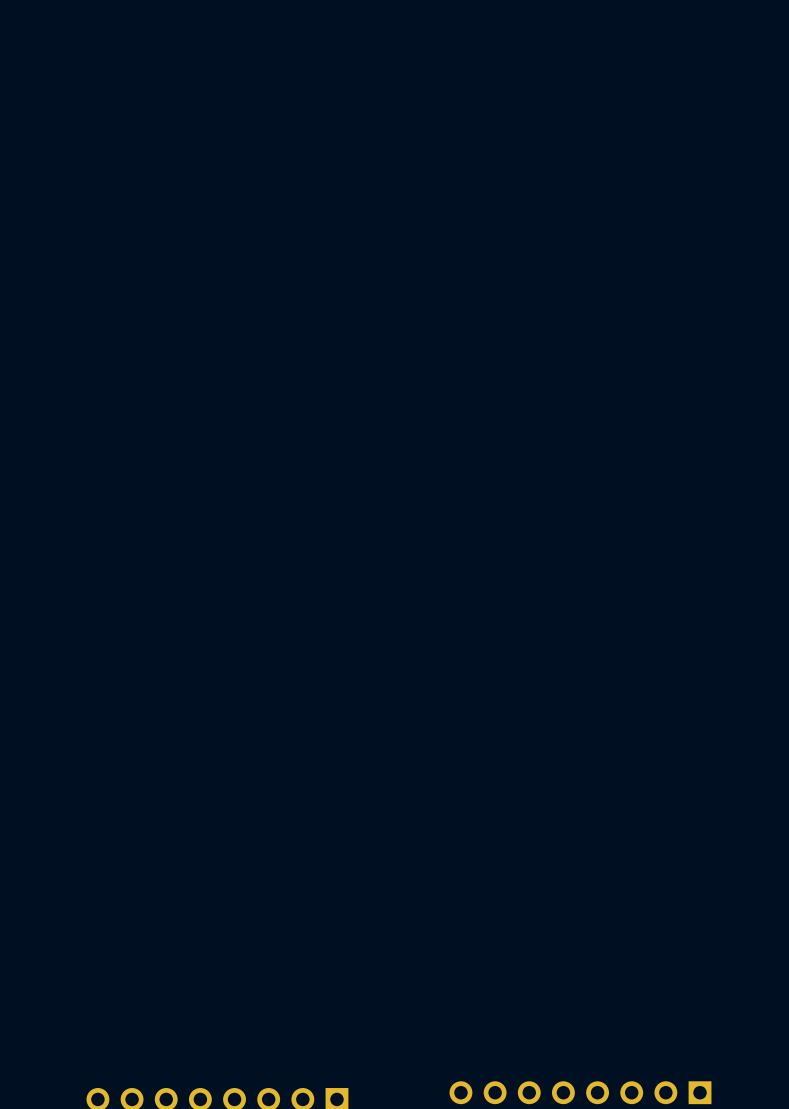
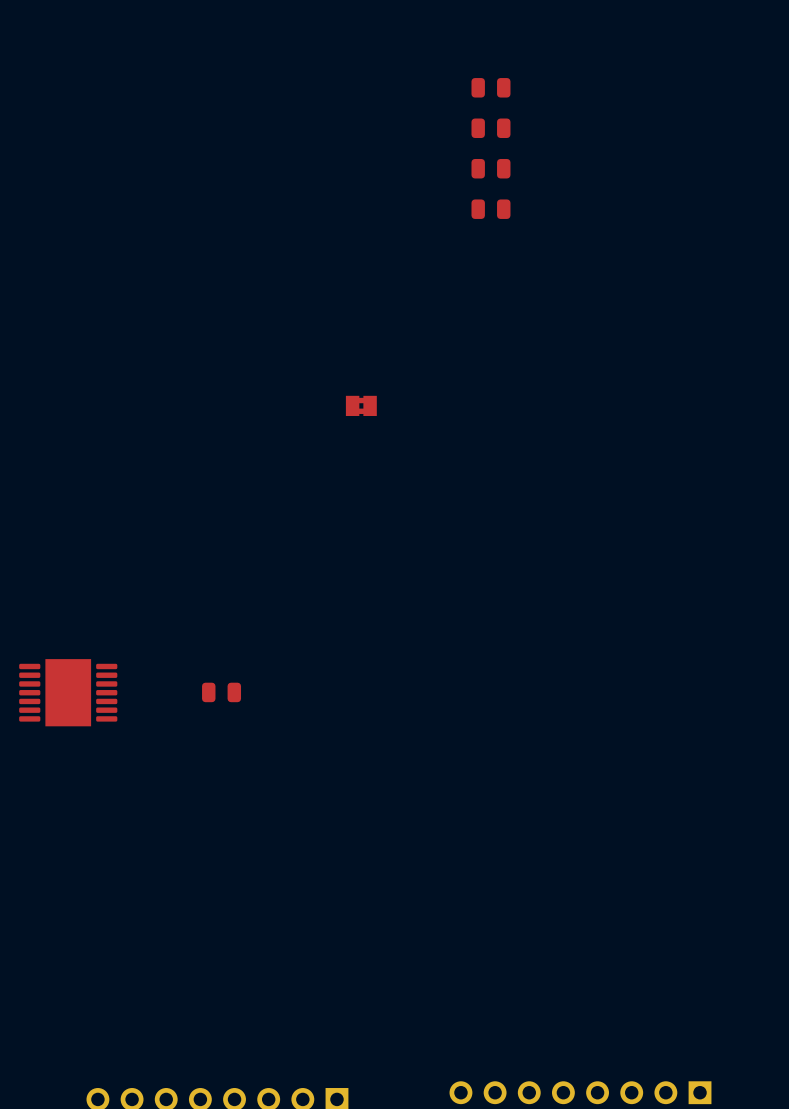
part: none -> (490, 87)
part: none -> (490, 128)
part: none -> (490, 168)
part: none -> (490, 209)
part: none -> (361, 405)
part: none -> (68, 692)
part: none -> (221, 692)

